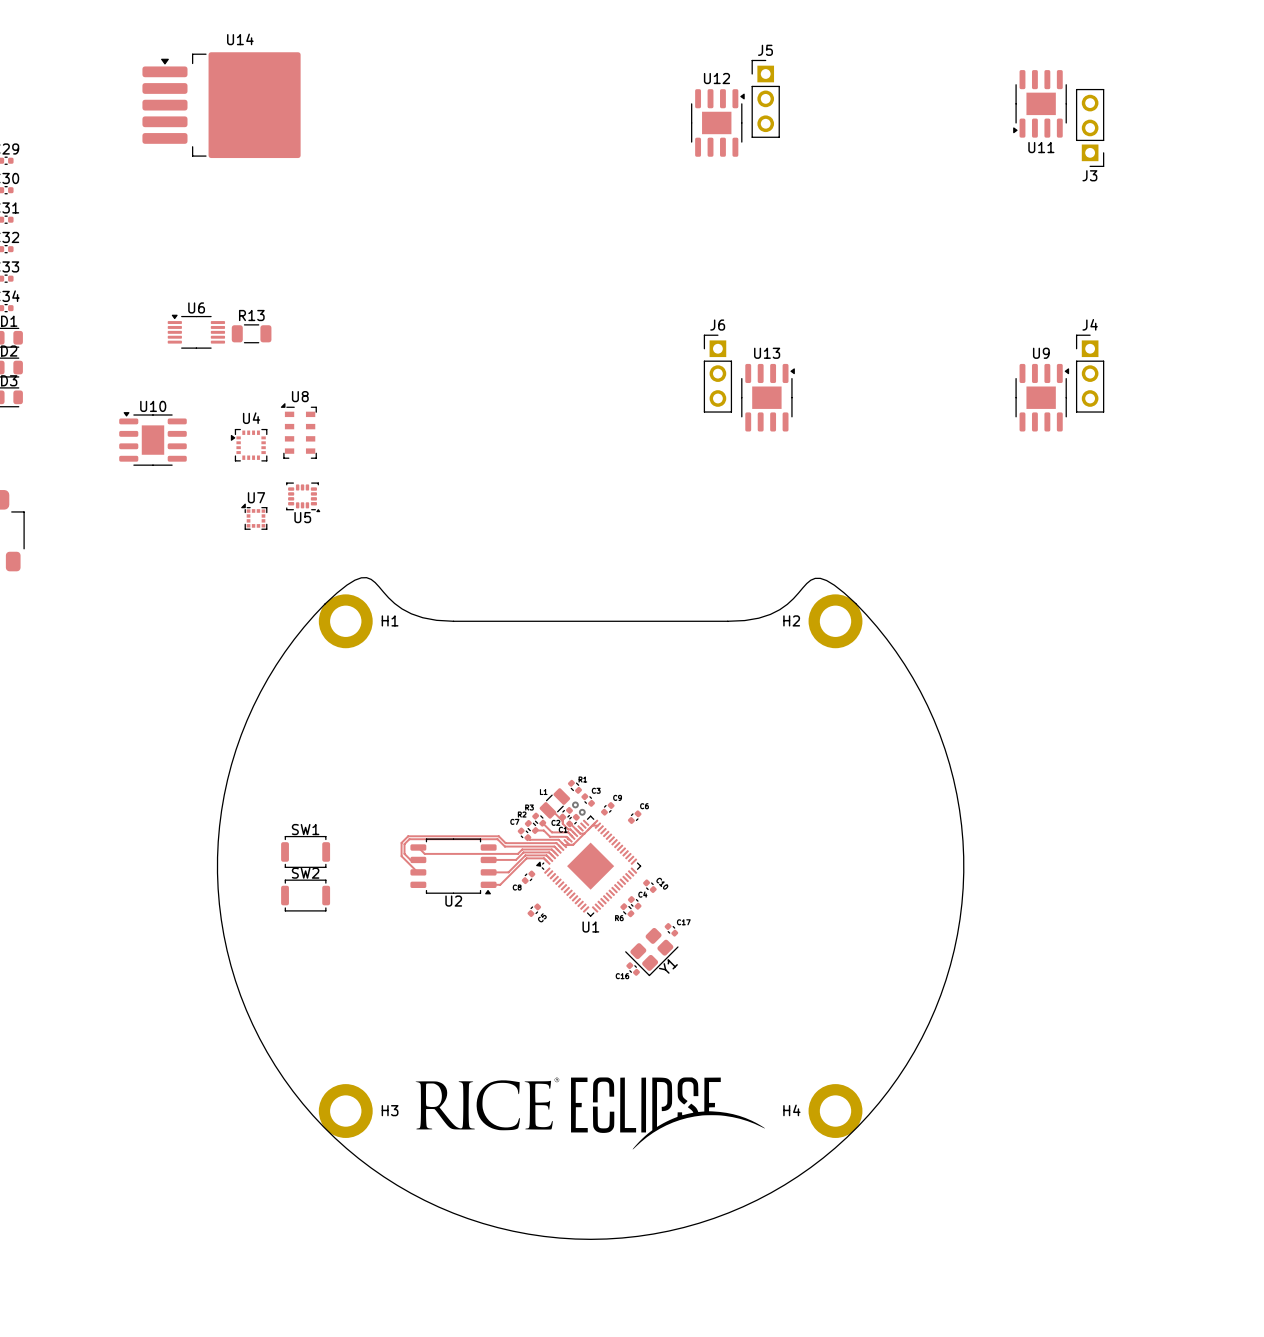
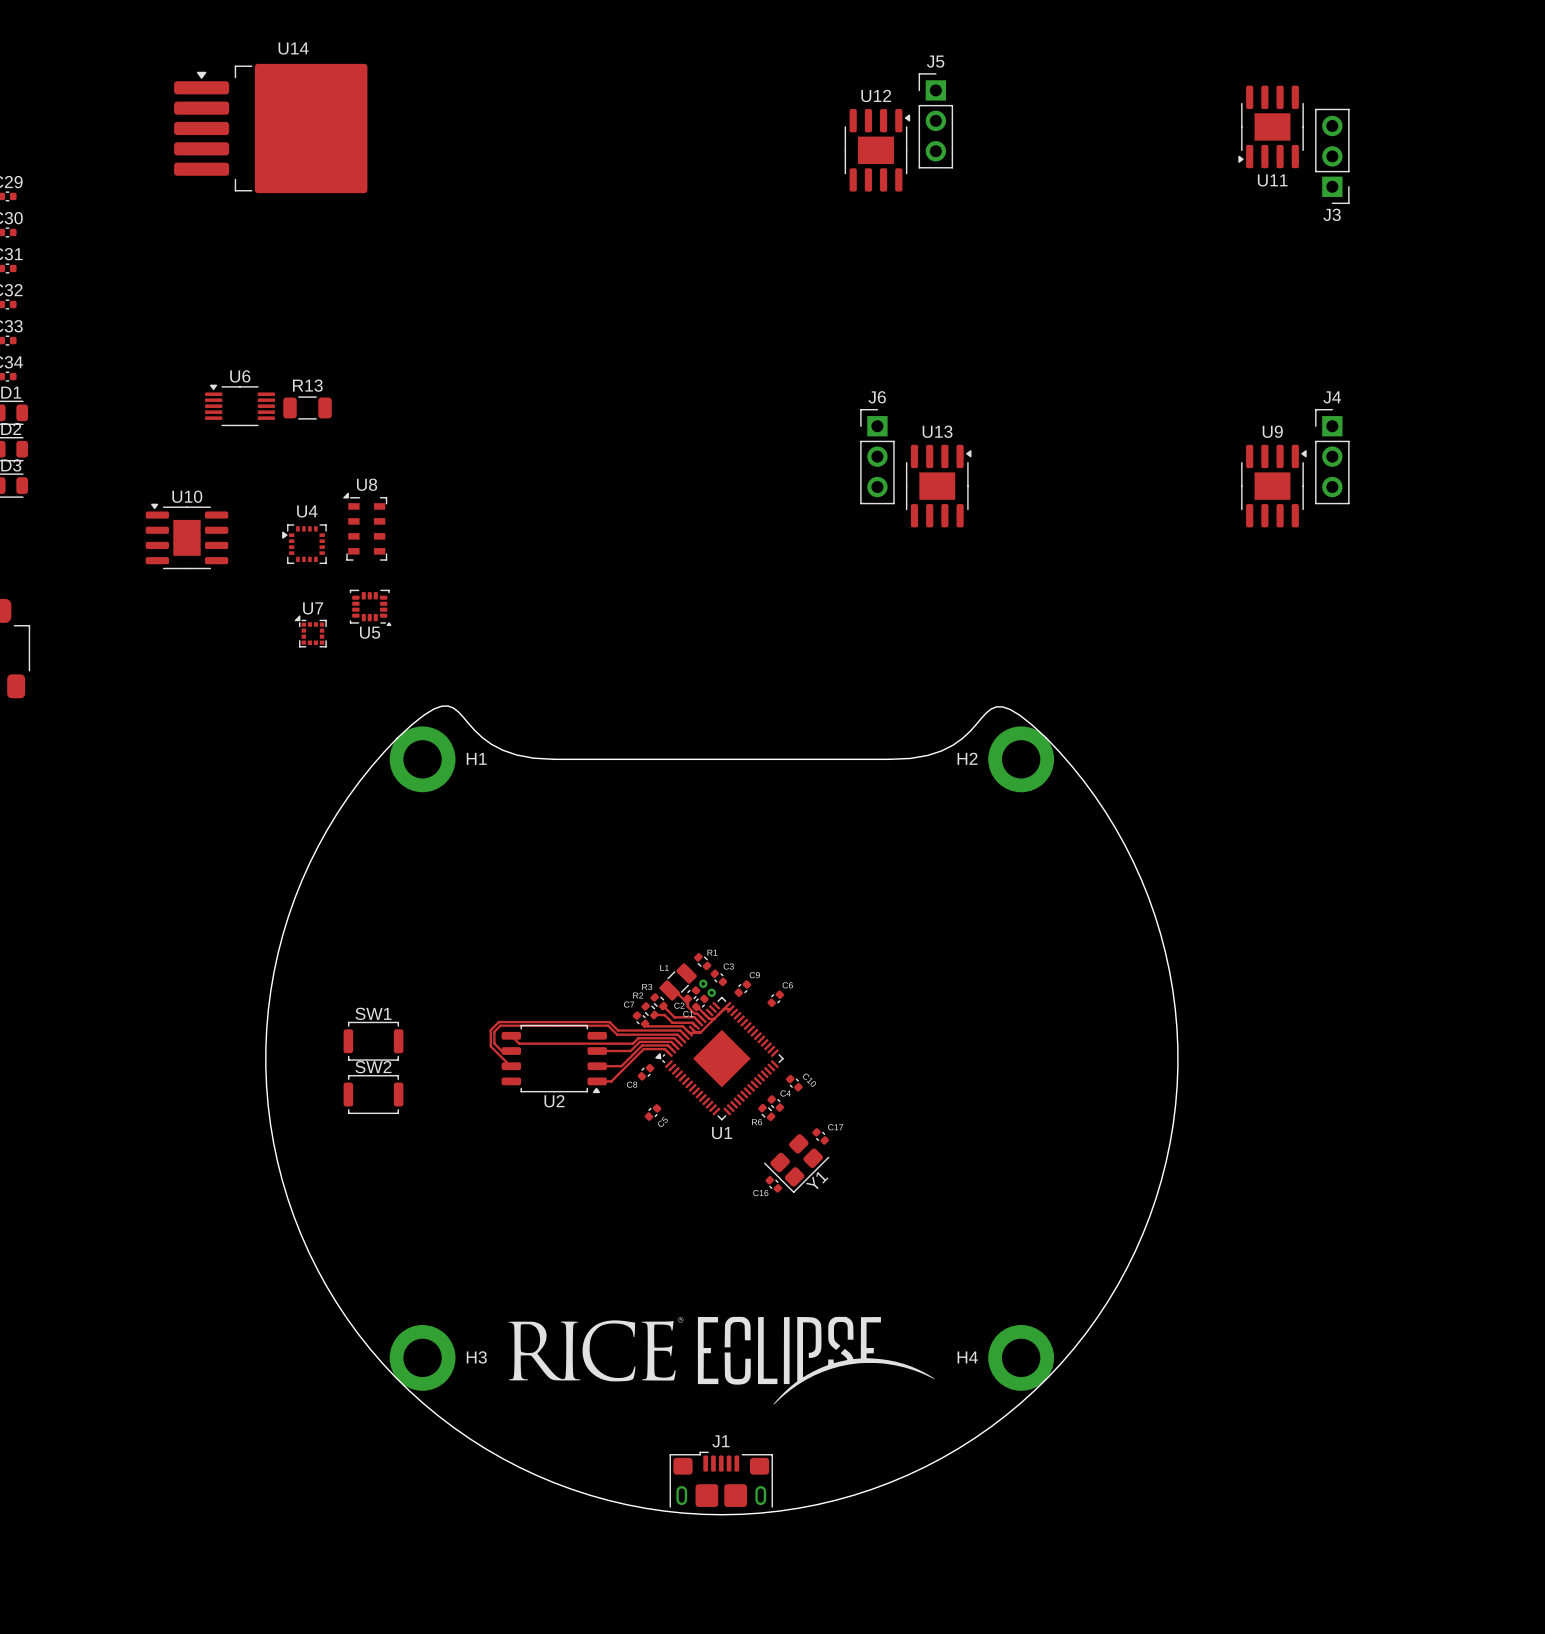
J1: none -> (721, 1479)

